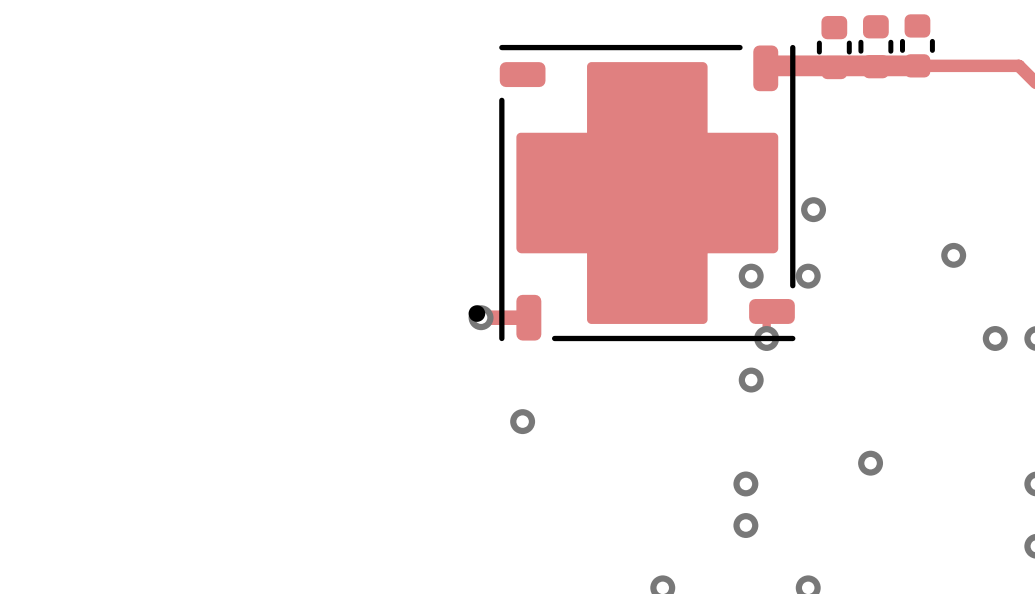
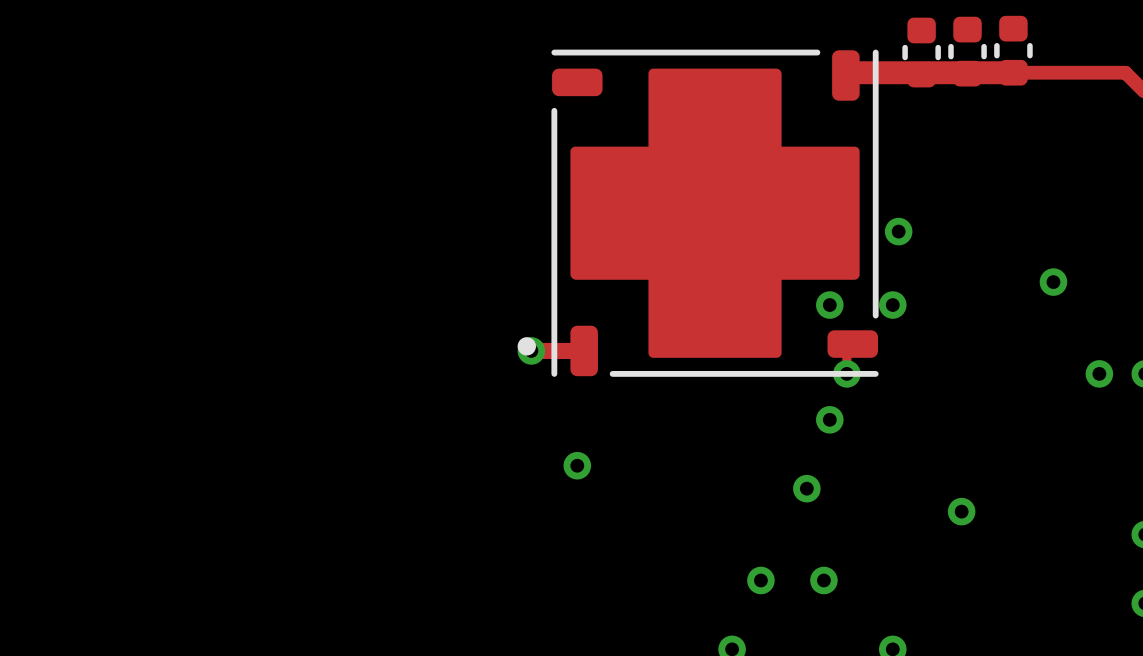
via: none -> (806, 488)
via: (745, 483) -> none
via: none -> (760, 580)

